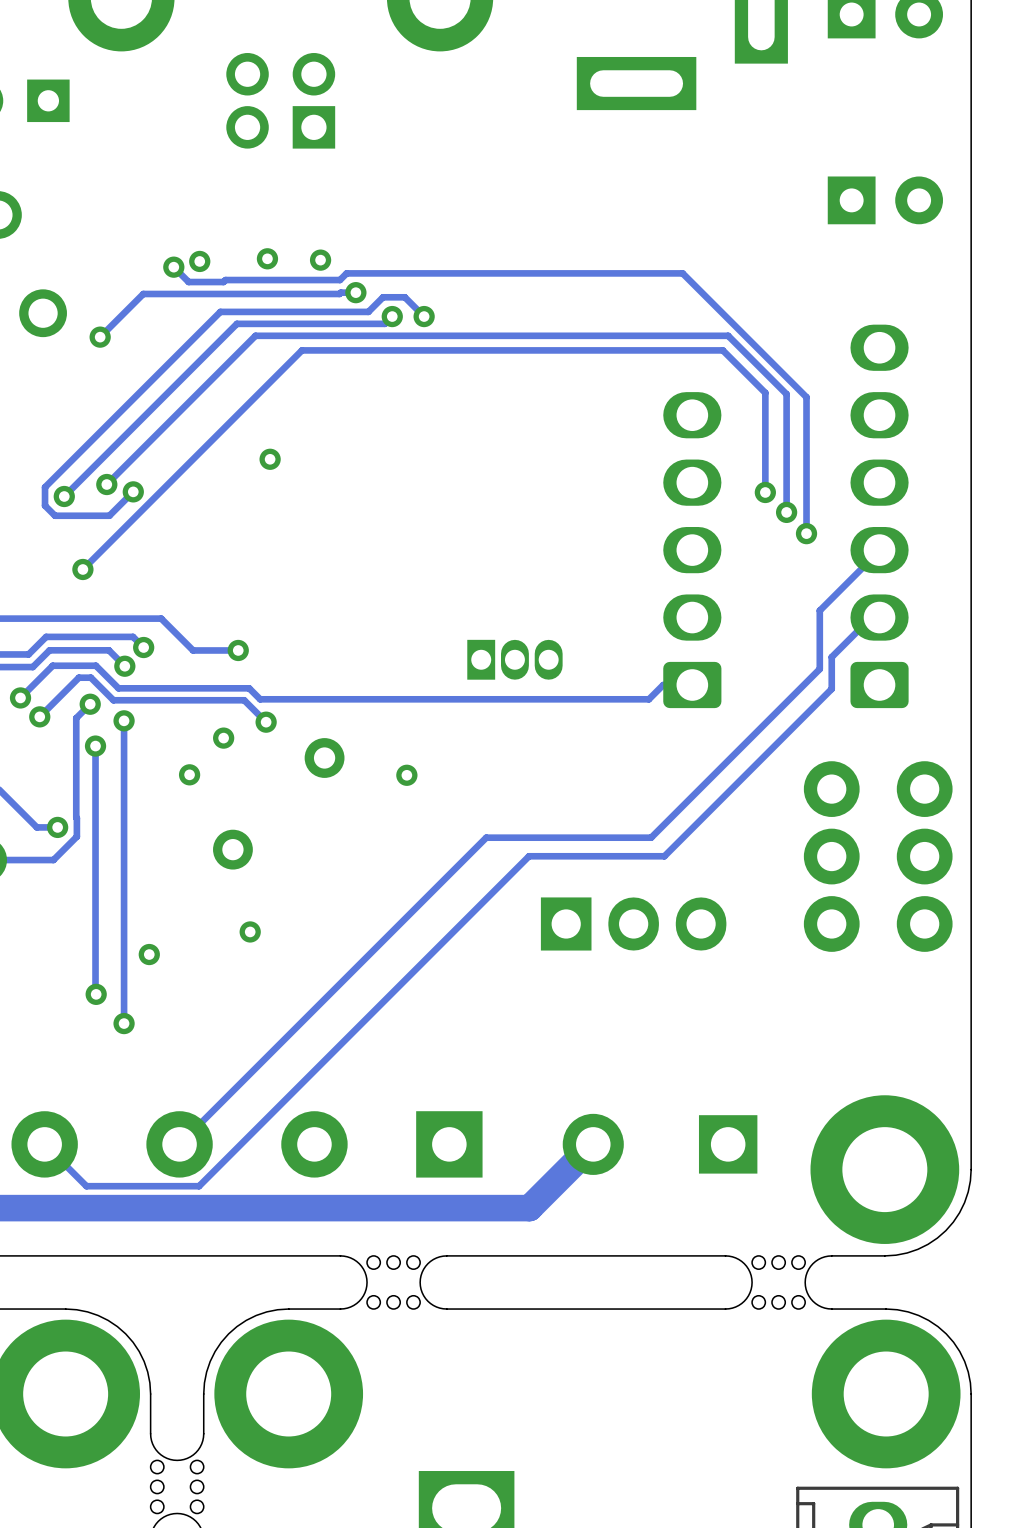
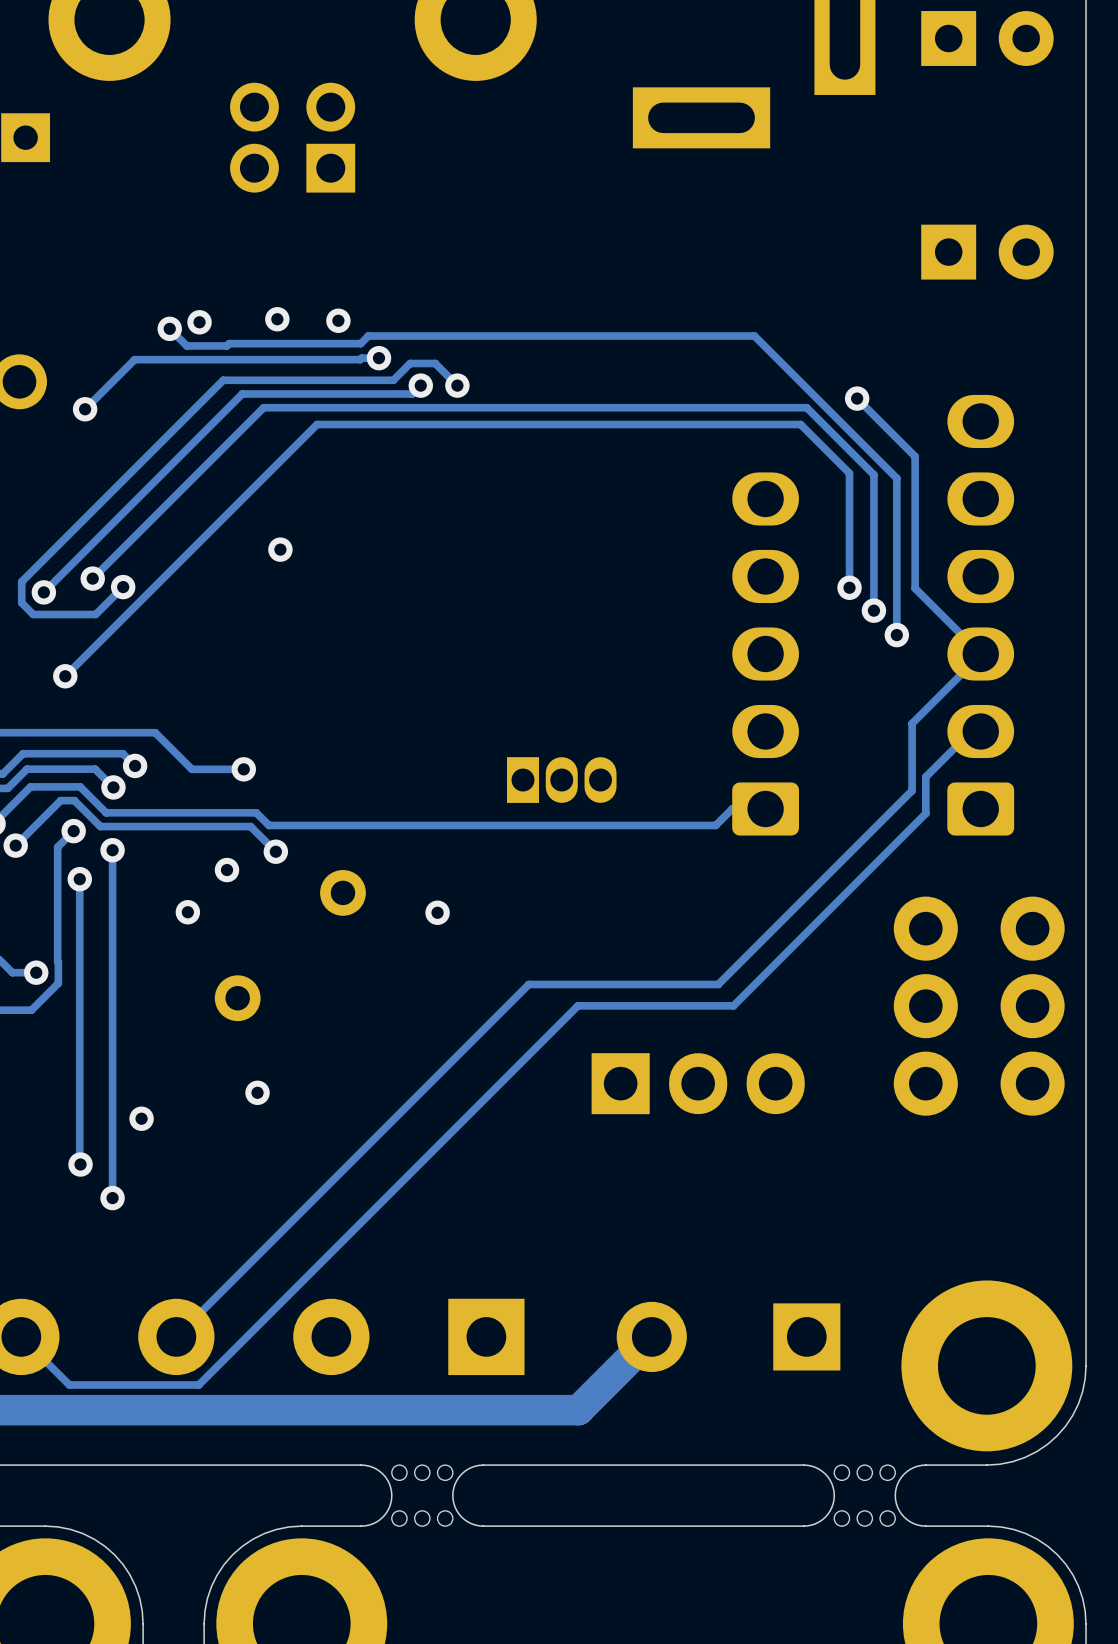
track: none -> (857, 398) (915, 456) (915, 588) (980, 653)
via: none -> (857, 398)

